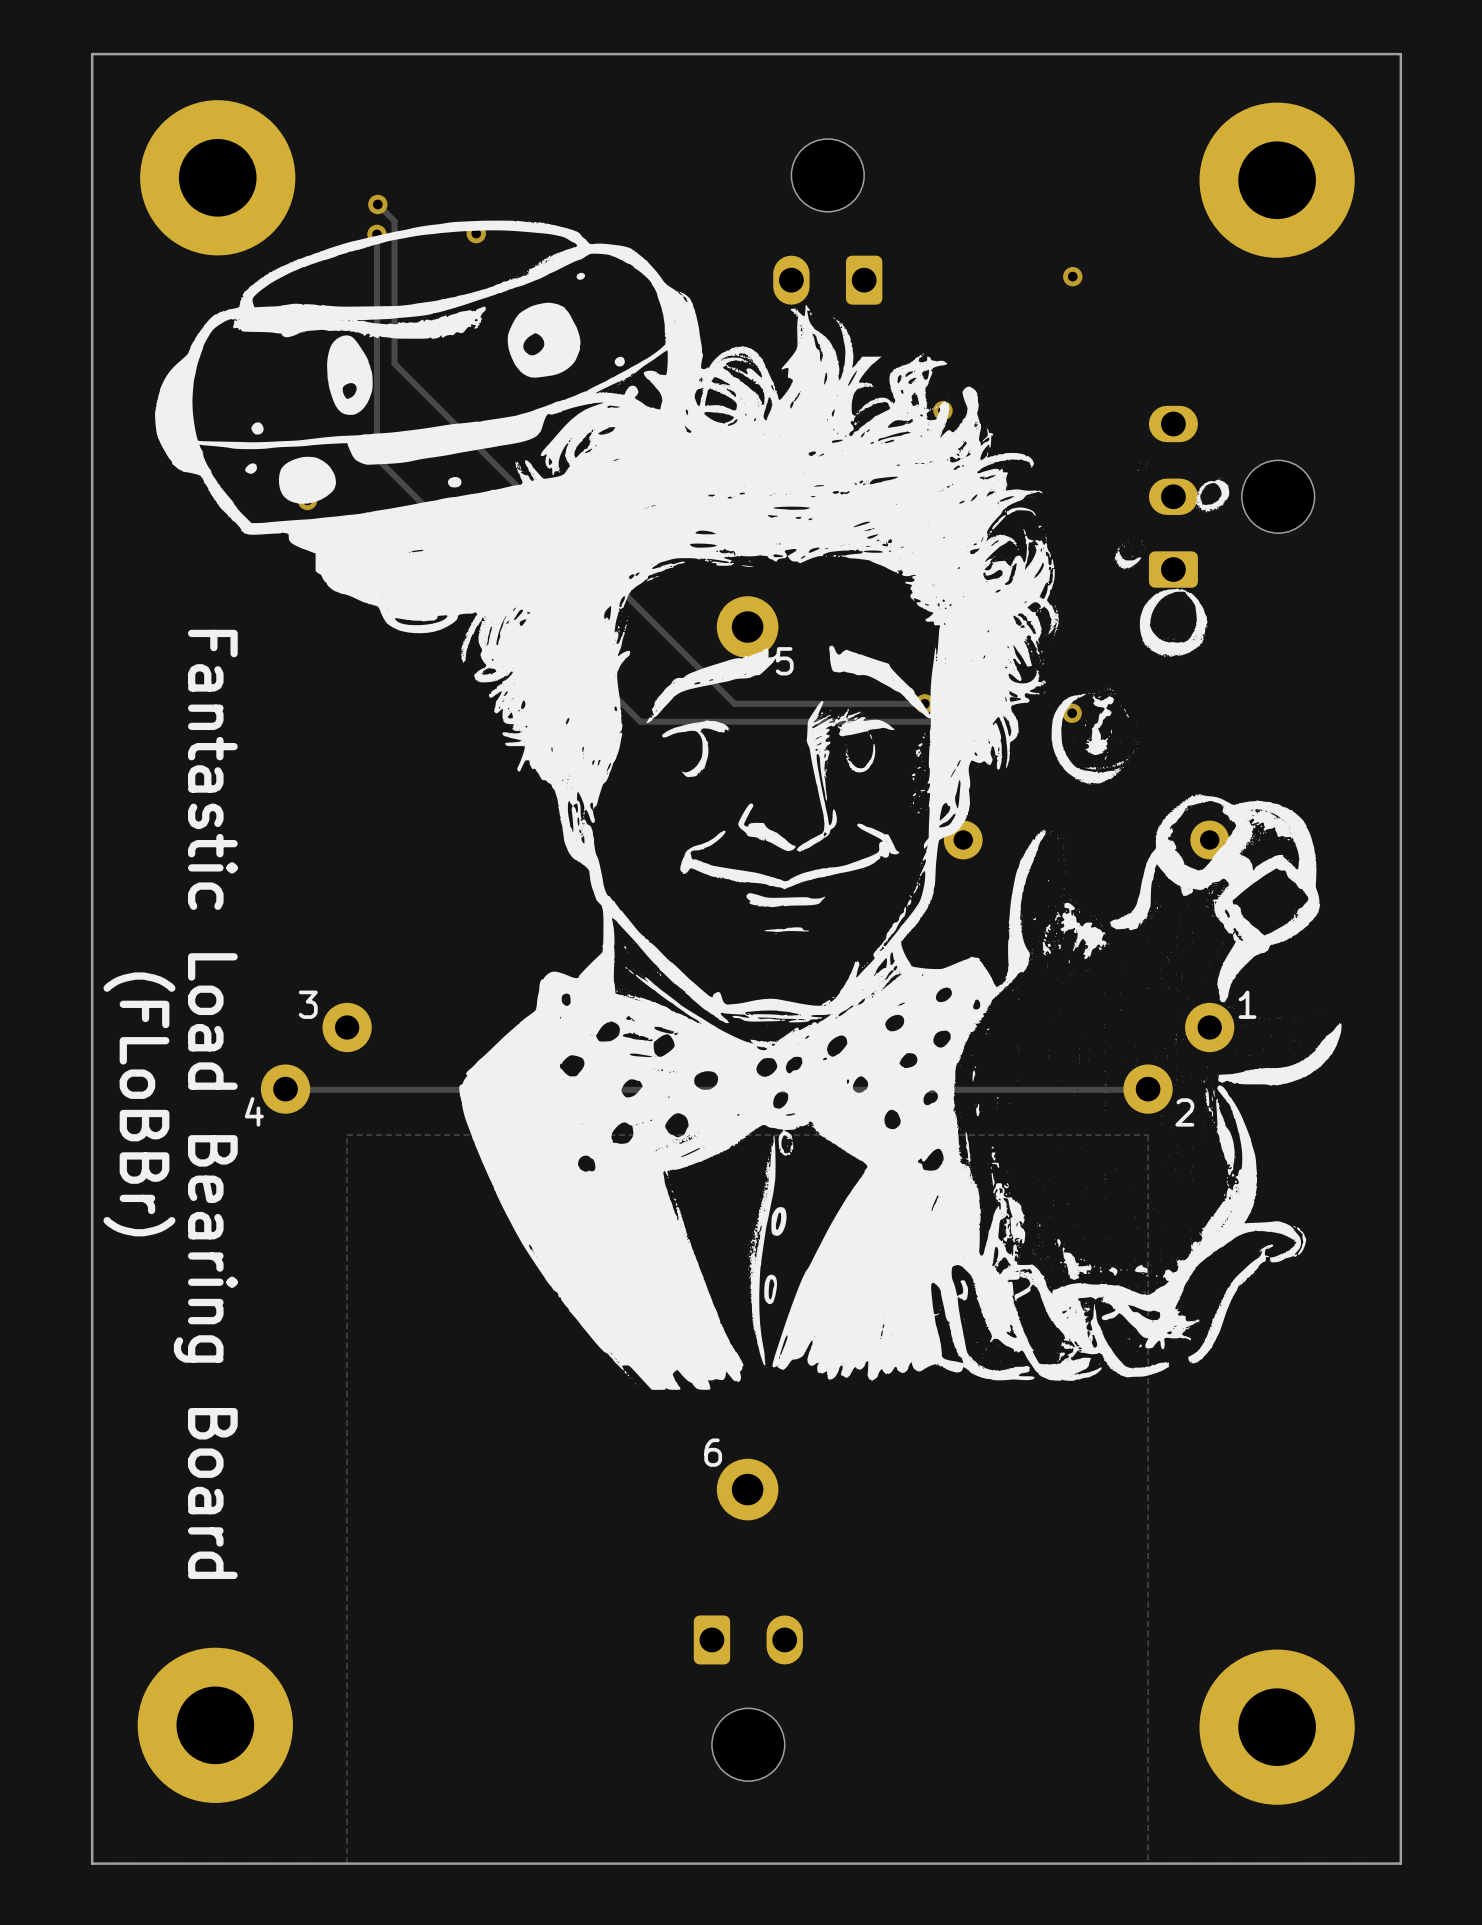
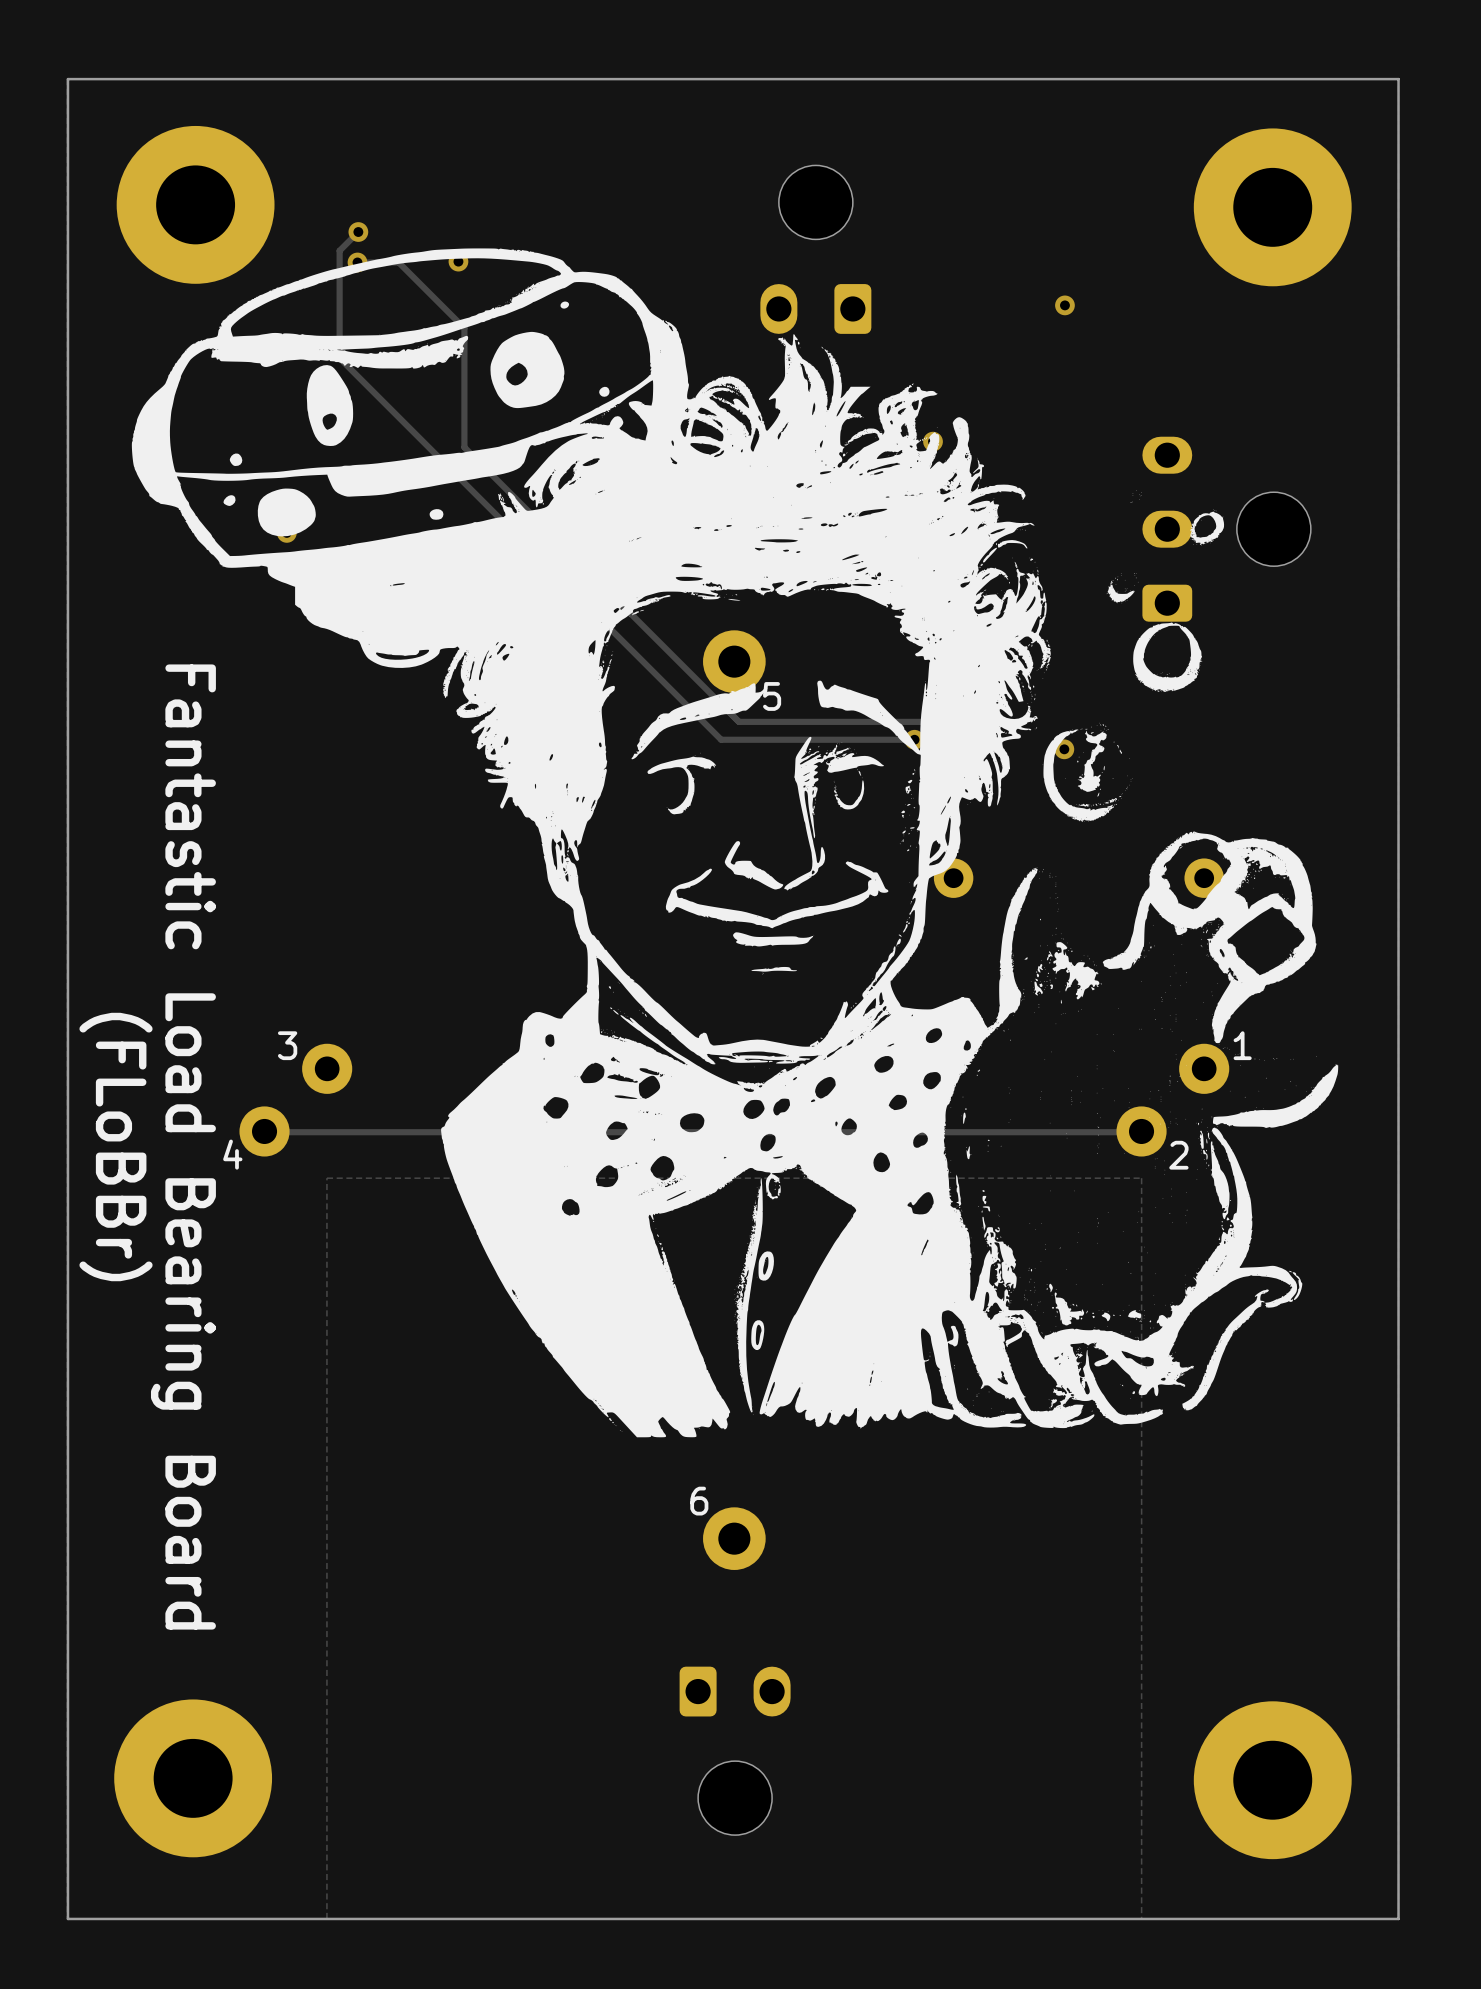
track: (377, 204) (394, 221) (394, 363) -> (358, 232) (339, 250) (339, 358) (375, 393)
track: (376, 234) (376, 458) (640, 721) (943, 721) (961, 703) -> (357, 262) (398, 262) (464, 328) (464, 447) (738, 721) (933, 721) (951, 739)

